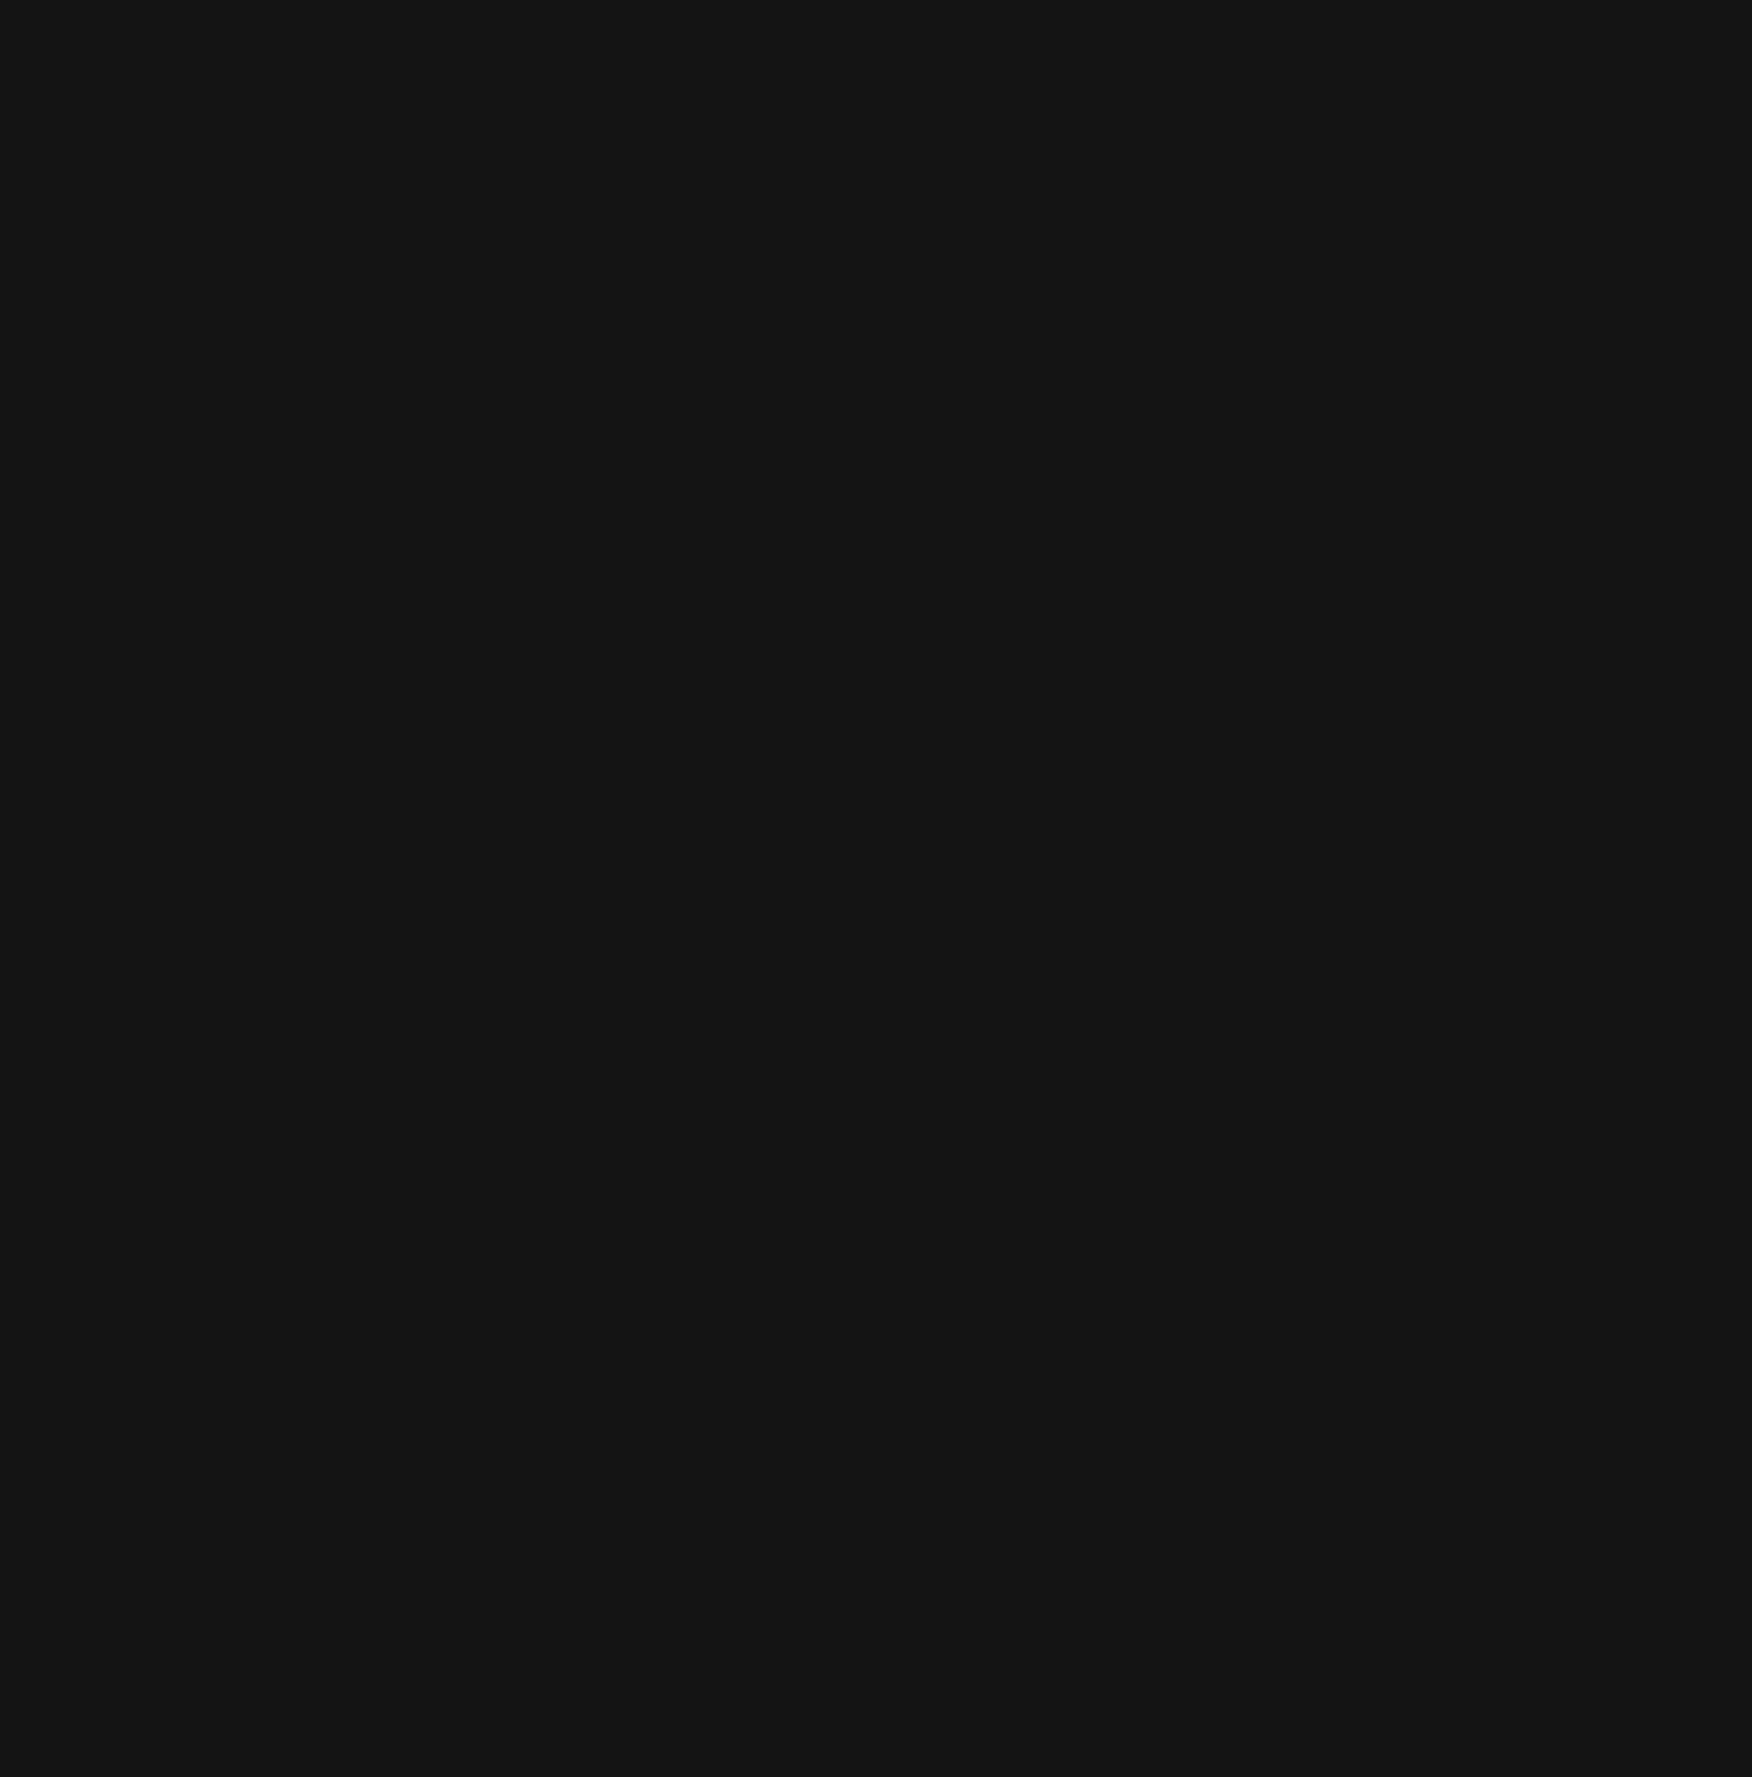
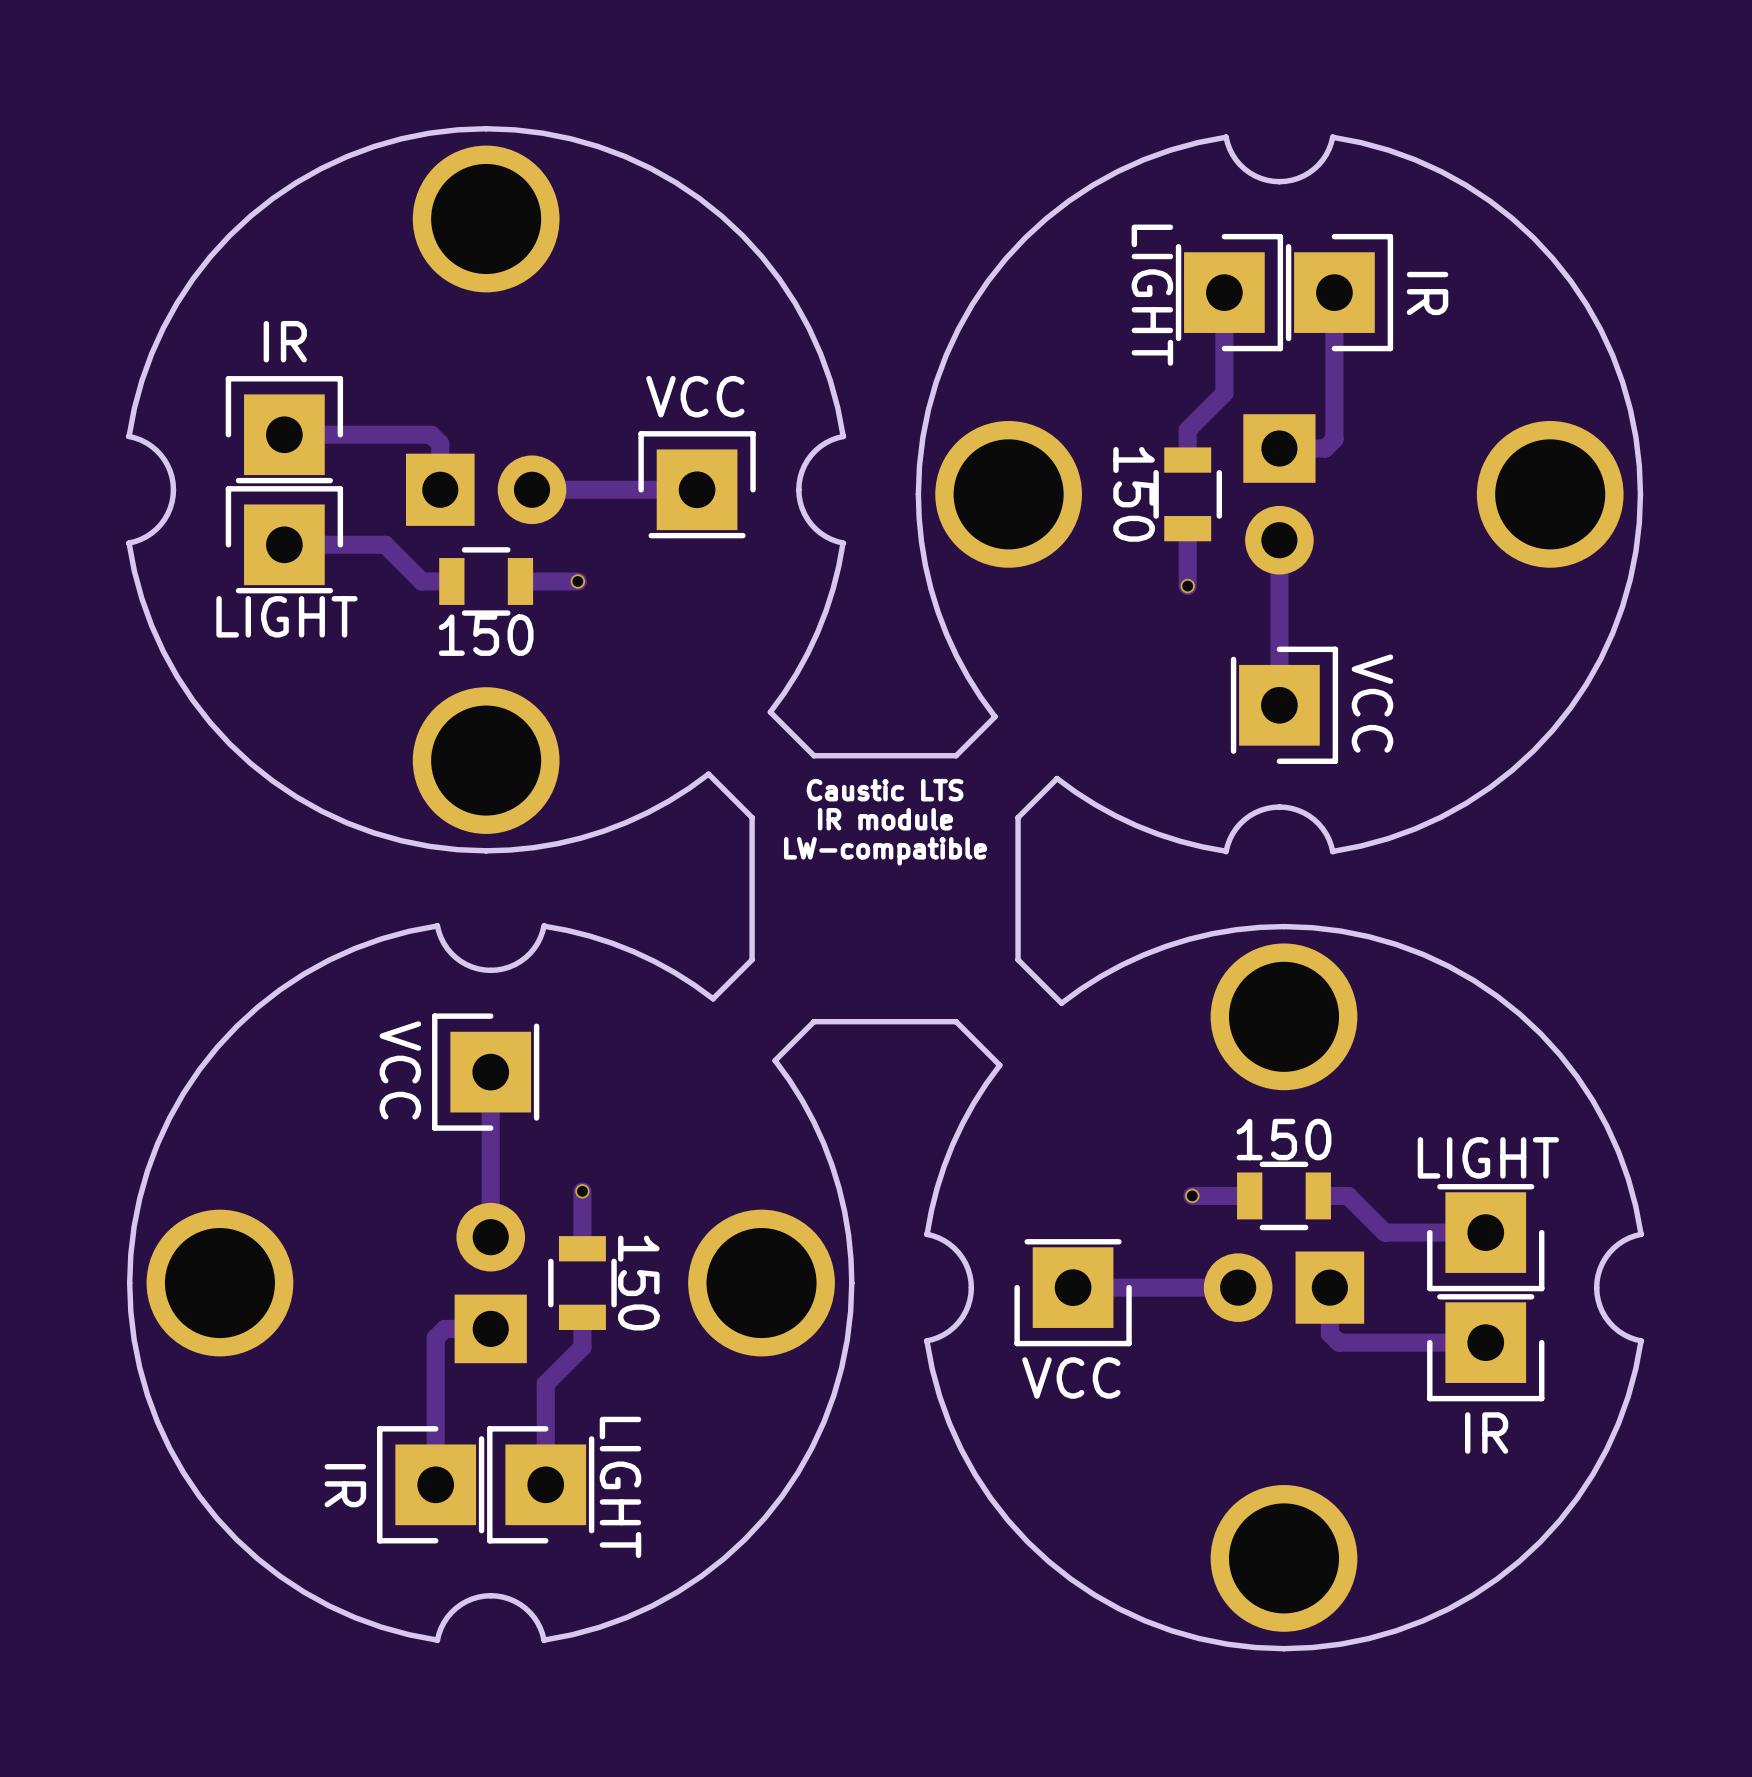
board edge: none -> (1332, 136) (1326, 154) (1314, 169) (1297, 178) (1279, 181) (1260, 178) (1244, 169) (1232, 154) (1226, 136)
board edge: none -> (1226, 137) (1170, 150) (1143, 159) (1092, 185) (1068, 201) (1046, 218) (1005, 258) (972, 304) (946, 355) (928, 409) (922, 437) (918, 494) (921, 542) (930, 589) (946, 634) (968, 677) (994, 716)
board edge: none -> (1332, 137) (1388, 150) (1415, 159) (1466, 185) (1512, 218) (1552, 258) (1586, 304) (1612, 355) (1622, 382) (1635, 437) (1640, 494) (1635, 551) (1622, 606) (1612, 633) (1586, 684) (1552, 730) (1512, 770) (1466, 803) (1415, 828) (1388, 838) (1332, 851)
part: none -> (486, 218)
track: none -> (1224, 292) (1224, 393) (1187, 430) (1187, 460)
part: none -> LIGHT (1229, 292)
track: none -> (1334, 292) (1334, 439) (1325, 448) (1279, 448)
part: none -> IR (1339, 292)
part: none -> IR (284, 429)
track: none -> (284, 434) (431, 434) (440, 443) (440, 489)
board edge: none -> (128, 436) (146, 442) (160, 454) (170, 471) (173, 489) (170, 508) (160, 524) (146, 536) (128, 543)
board edge: none -> (843, 436) (825, 442) (811, 454) (802, 471) (798, 489) (802, 508) (811, 524) (825, 536) (843, 543)
board edge: none -> (843, 436) (830, 380) (808, 328) (779, 279) (761, 256) (721, 216) (675, 182) (651, 168) (598, 146) (542, 133) (486, 128) (429, 133) (373, 146) (321, 168) (296, 182) (250, 216) (210, 256) (192, 279) (163, 328) (141, 380) (129, 436)
part: none -> VCC (697, 484)
part: none -> (486, 489)
track: none -> (697, 489) (532, 489)
part: none -> (1008, 494)
part: none -> 150 (1187, 494)
part: none -> (1279, 494)
part: none -> (1550, 494)
track: none -> (1187, 528) (1187, 586)
part: none -> LIGHT (284, 539)
track: none -> (1279, 540) (1279, 705)
board edge: none -> (129, 543) (141, 598) (163, 651) (192, 700) (210, 722) (250, 763) (272, 781) (296, 796) (347, 823) (401, 840) (429, 846) (486, 850) (533, 847) (580, 838) (626, 822) (668, 801) (708, 774) (752, 817) (752, 959) (713, 998) (674, 972) (633, 951) (589, 936) (544, 926)
board edge: none -> (842, 543) (833, 588) (817, 632) (796, 673) (770, 712)
track: none -> (284, 544) (385, 544) (421, 581) (451, 581)
part: none -> 150 (486, 581)
track: none -> (577, 581) (520, 581)
via: none -> (577, 581)
via: none -> (1187, 586)
part: none -> VCC (1284, 705)
board edge: none -> (770, 712) (814, 755) (956, 755) (995, 716)
part: none -> (486, 760)
text: none -> Caustic LTS (885, 790)
text: none -> IR module (885, 819)
text: none -> LW-compatible (885, 851)
board edge: none -> (1225, 851) (1180, 841) (1136, 825) (1095, 804) (1057, 778) (1018, 817) (1018, 959) (1061, 1003)
board edge: none -> (1332, 851) (1326, 834) (1314, 819) (1297, 810) (1279, 807) (1260, 810) (1244, 819) (1232, 834) (1226, 851)
board edge: none -> (437, 925) (409, 931) (354, 948) (304, 974) (257, 1007) (217, 1047) (183, 1093) (157, 1144) (139, 1198) (130, 1254) (129, 1283) (130, 1311) (139, 1367) (157, 1422) (183, 1472) (217, 1518) (257, 1558) (304, 1592) (354, 1617) (409, 1634) (437, 1640)
board edge: none -> (544, 925) (537, 943) (525, 957) (509, 967) (490, 970) (472, 967) (455, 957) (443, 943) (437, 925)
board edge: none -> (1061, 1003) (1101, 976) (1144, 954) (1189, 939) (1236, 929) (1284, 926) (1340, 931) (1368, 936) (1422, 954) (1473, 980) (1519, 1014) (1540, 1033) (1577, 1077) (1593, 1100) (1618, 1151) (1628, 1178) (1641, 1234)
part: none -> (1284, 1016)
board edge: none -> (775, 1060) (814, 1021) (956, 1021) (999, 1065) (973, 1103) (952, 1144) (937, 1188) (927, 1233)
board edge: none -> (775, 1060) (802, 1100) (823, 1143) (839, 1188) (848, 1235) (851, 1283) (847, 1339) (841, 1367) (823, 1422) (797, 1472) (764, 1518) (744, 1539) (701, 1576) (677, 1592) (626, 1617) (572, 1634) (544, 1640)
part: none -> VCC (485, 1072)
track: none -> (490, 1072) (490, 1237)
track: none -> (582, 1191) (582, 1248)
via: none -> (582, 1191)
via: none -> (1192, 1195)
track: none -> (1249, 1195) (1192, 1195)
part: none -> 150 (1284, 1195)
track: none -> (1318, 1195) (1348, 1195) (1384, 1232) (1485, 1232)
board edge: none -> (926, 1234) (944, 1240) (958, 1252) (968, 1269) (971, 1287) (968, 1306) (958, 1322) (944, 1334) (926, 1340)
board edge: none -> (1641, 1234) (1623, 1240) (1609, 1252) (1599, 1269) (1596, 1287) (1599, 1306) (1609, 1322) (1623, 1334) (1641, 1340)
part: none -> LIGHT (1485, 1237)
part: none -> (219, 1283)
part: none -> (490, 1283)
part: none -> 150 (582, 1283)
part: none -> (761, 1283)
track: none -> (1238, 1287) (1073, 1287)
part: none -> (1284, 1287)
track: none -> (1329, 1287) (1329, 1333) (1339, 1342) (1485, 1342)
part: none -> VCC (1073, 1292)
track: none -> (582, 1317) (582, 1347) (545, 1383) (545, 1484)
track: none -> (490, 1328) (444, 1328) (435, 1338) (435, 1484)
board edge: none -> (1641, 1341) (1628, 1396) (1618, 1423) (1593, 1474) (1559, 1520) (1519, 1561) (1473, 1594) (1422, 1620) (1368, 1638) (1312, 1647) (1284, 1648) (1255, 1647) (1199, 1638) (1145, 1620) (1094, 1594) (1048, 1561) (1008, 1520) (974, 1474) (949, 1423) (939, 1396) (926, 1341)
part: none -> IR (1485, 1347)
part: none -> IR (430, 1484)
part: none -> LIGHT (540, 1484)
part: none -> (1284, 1558)
board edge: none -> (544, 1640) (537, 1622) (525, 1608) (509, 1598) (490, 1595) (472, 1598) (455, 1608) (443, 1622) (437, 1640)

